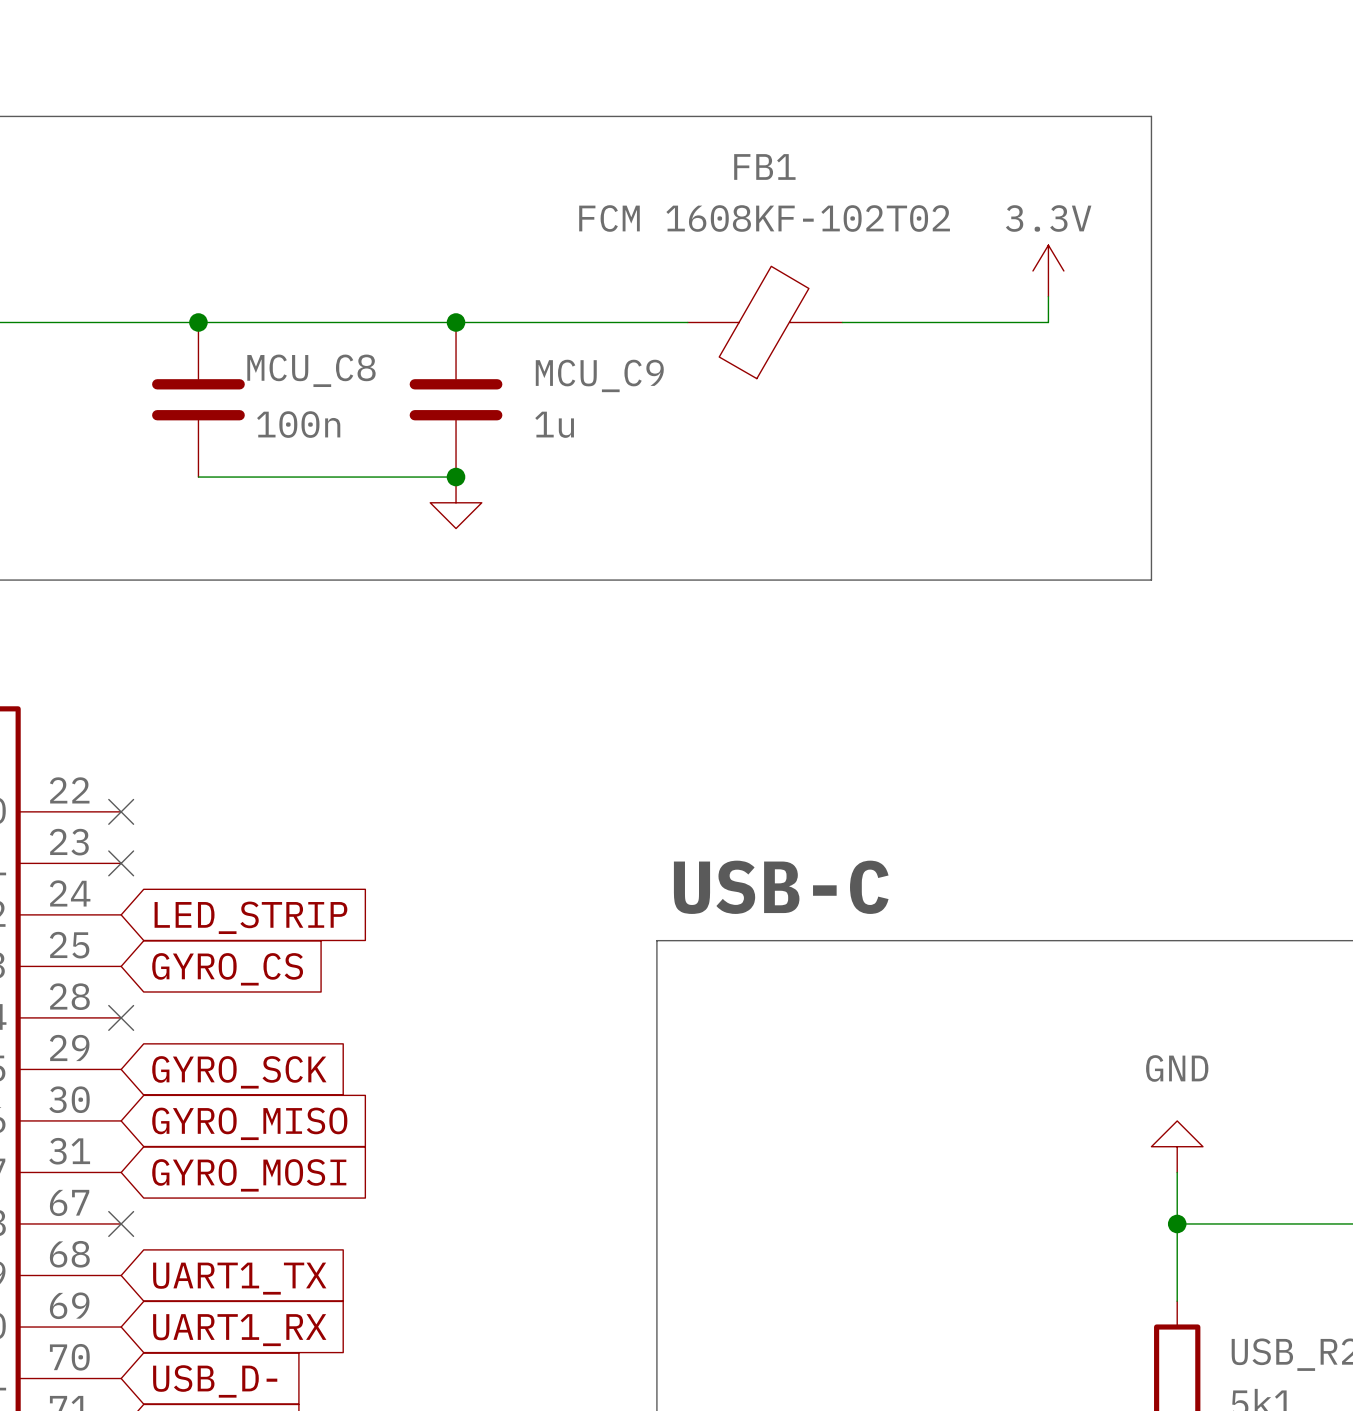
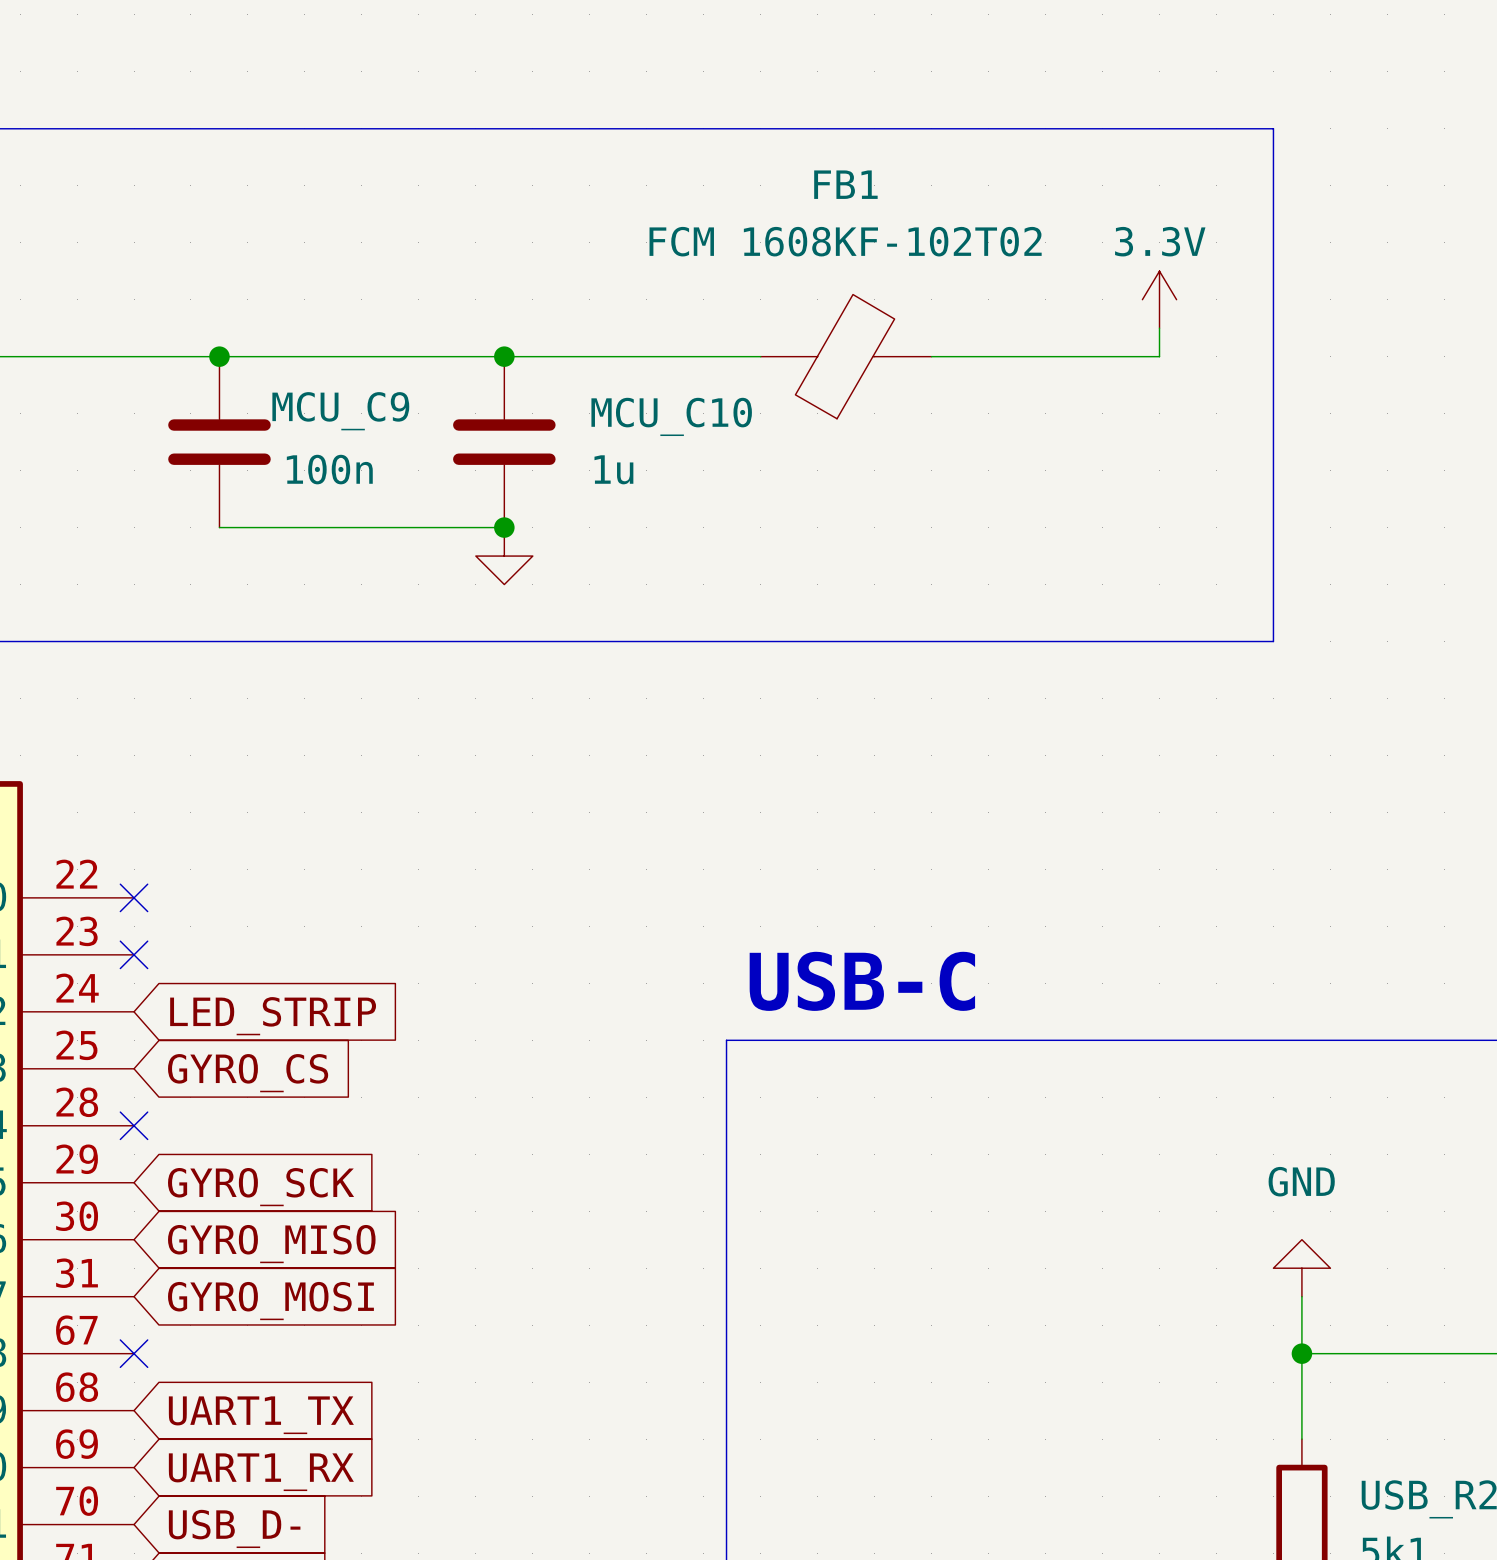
MCU_C8 name: MCU_C8 (311, 370) -> MCU_C9 (340, 411)
MCU_C9 name: MCU_C9 (599, 375) -> MCU_C10 (671, 416)

